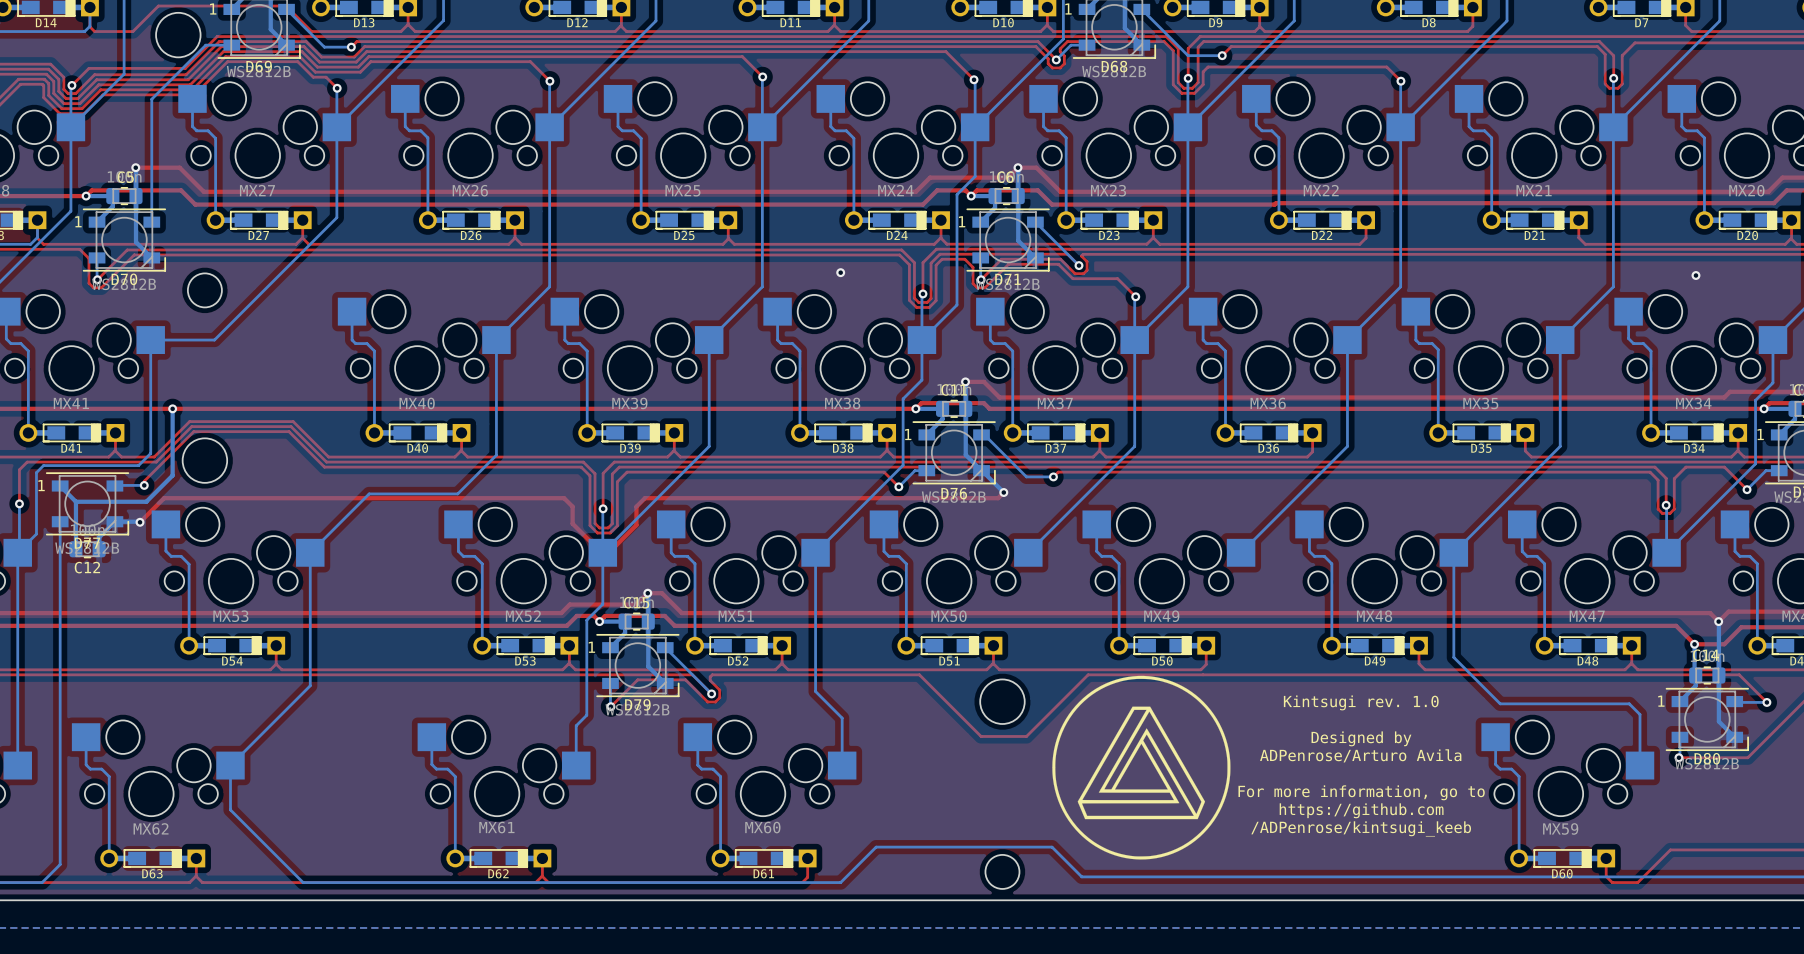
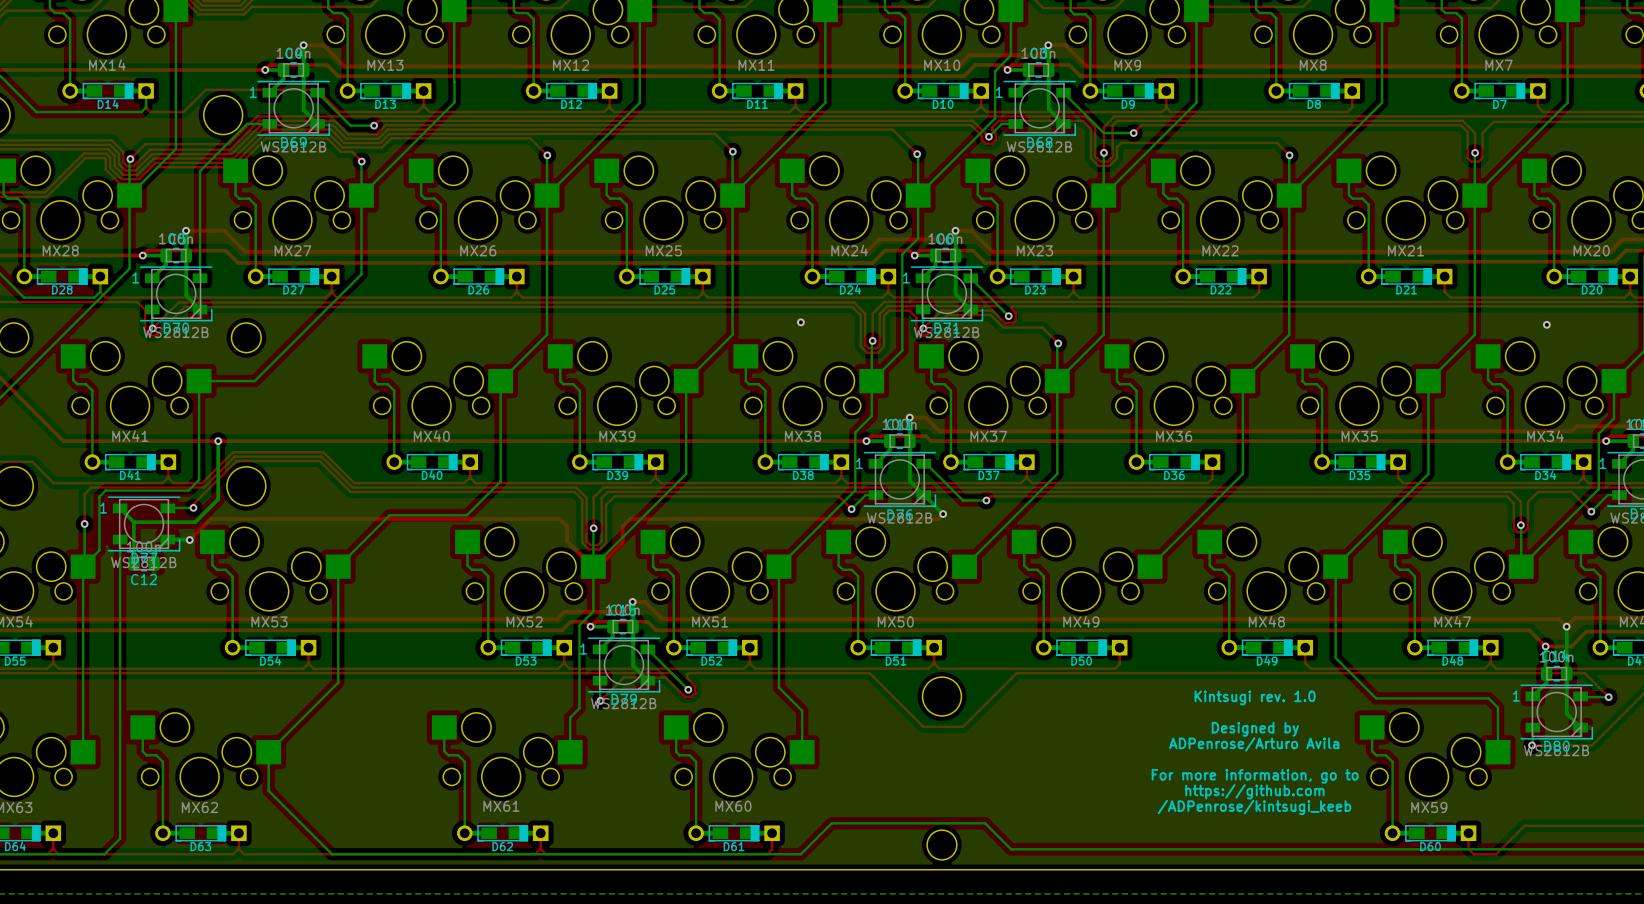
drawing: [1052, 675, 1231, 860] -> none

